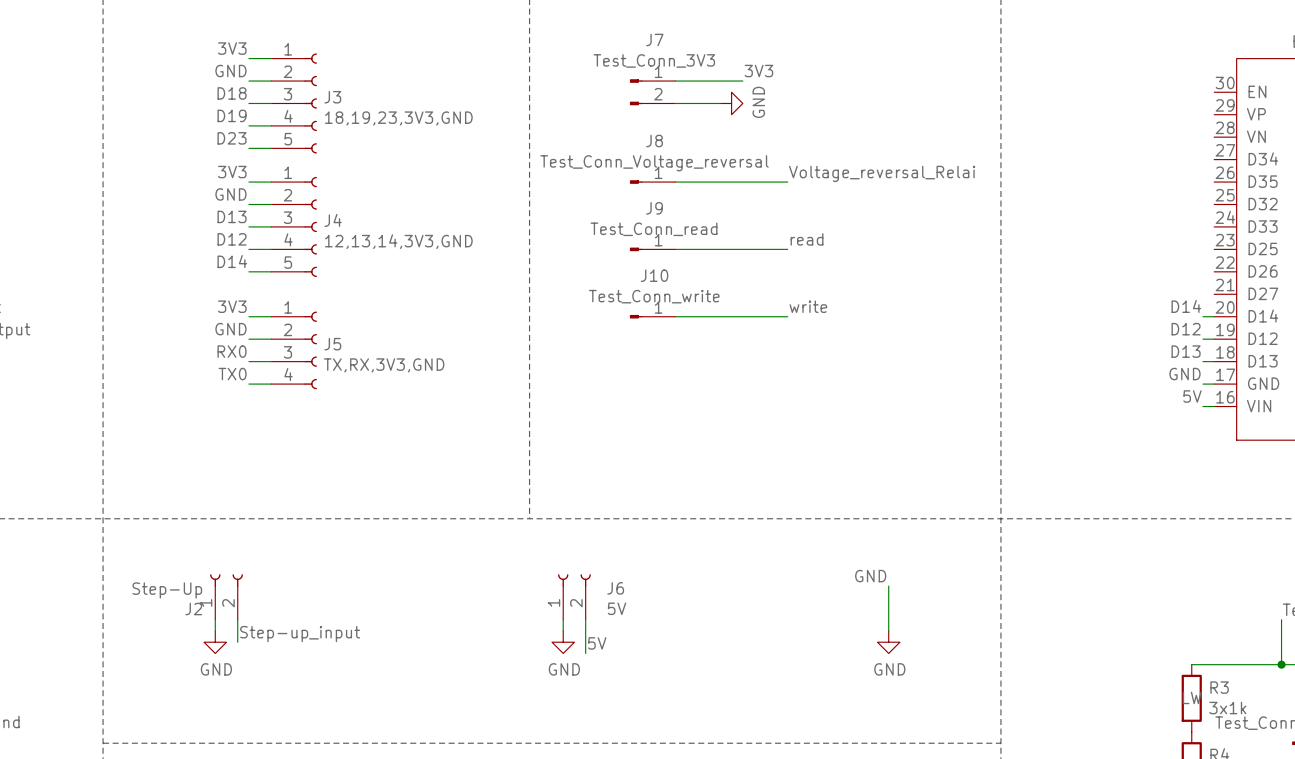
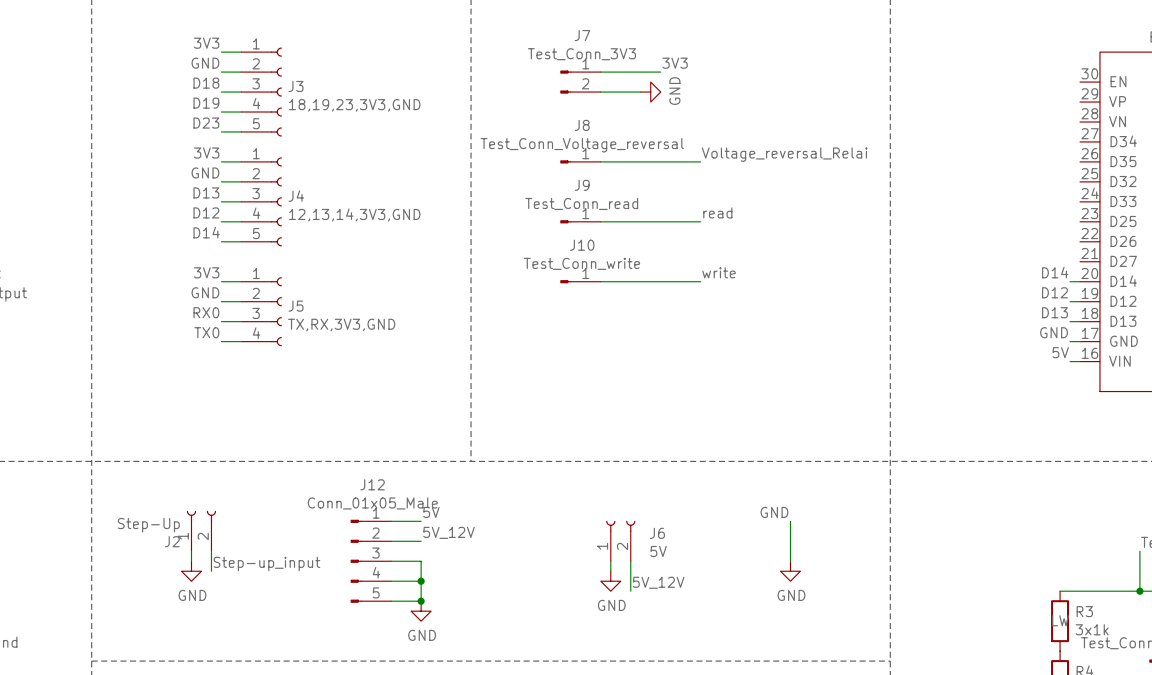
label: none -> 5V (431, 512)
wire: none -> (391, 521) (421, 521)
J6 position: (574, 596) -> (620, 540)
label: none -> 5V_12V (449, 532)
wire: none -> (391, 541) (421, 541)
wire: (563, 619) (563, 630) -> (610, 561) (610, 571)
wire: (585, 619) (585, 653) -> (630, 561) (630, 591)
J12: none -> Conn_01x05_Male (370, 561)
wire: none -> (391, 561) (421, 561) (421, 601) (391, 601)
power symbol: GND (563, 642) -> none
label: 5V (597, 643) -> none
wire: none -> (391, 581) (421, 581)
junction: none -> (421, 581)
power symbol: none -> GND (610, 581)
label: none -> 5V_12V (658, 582)
junction: none -> (421, 601)
power symbol: none -> GND (421, 611)

